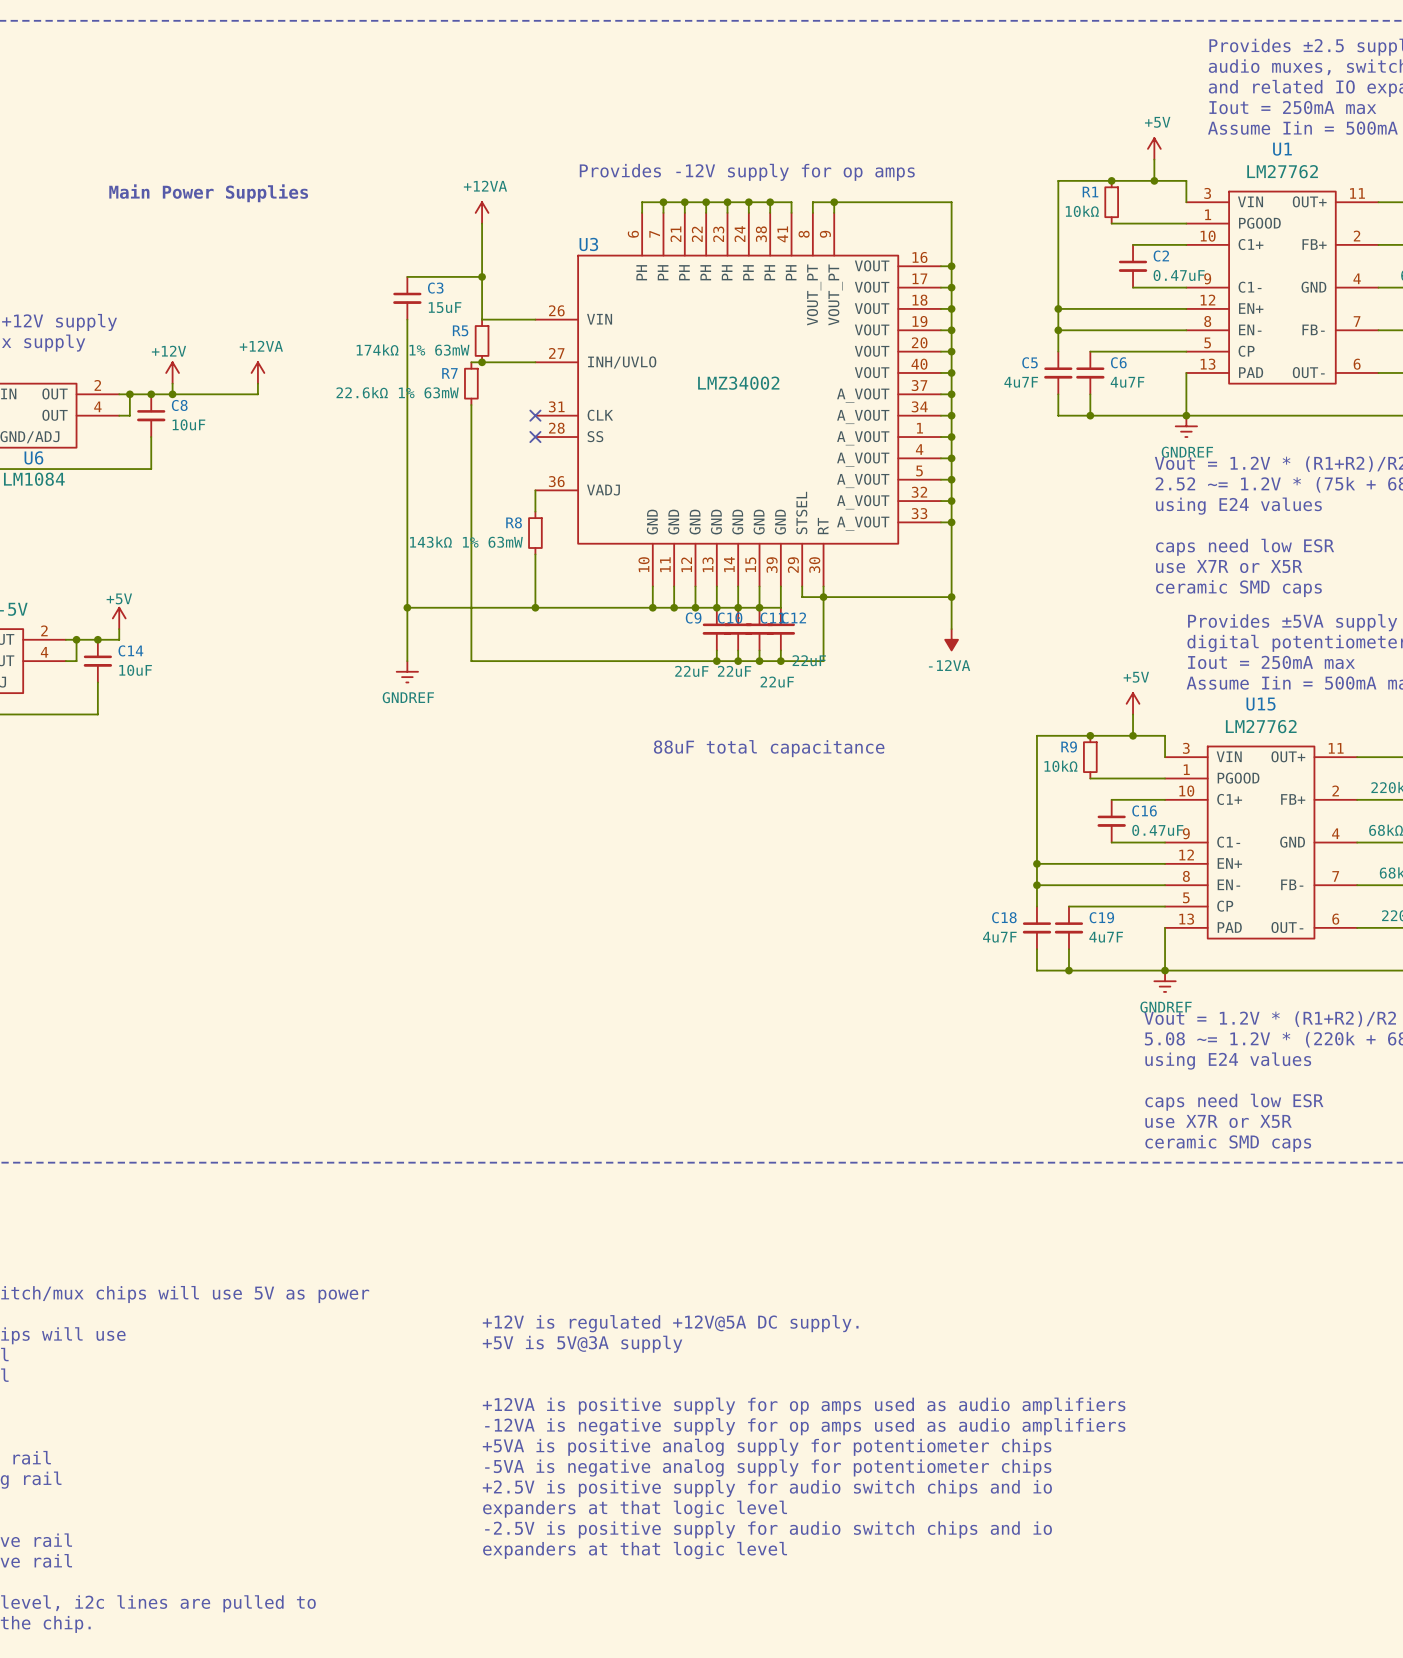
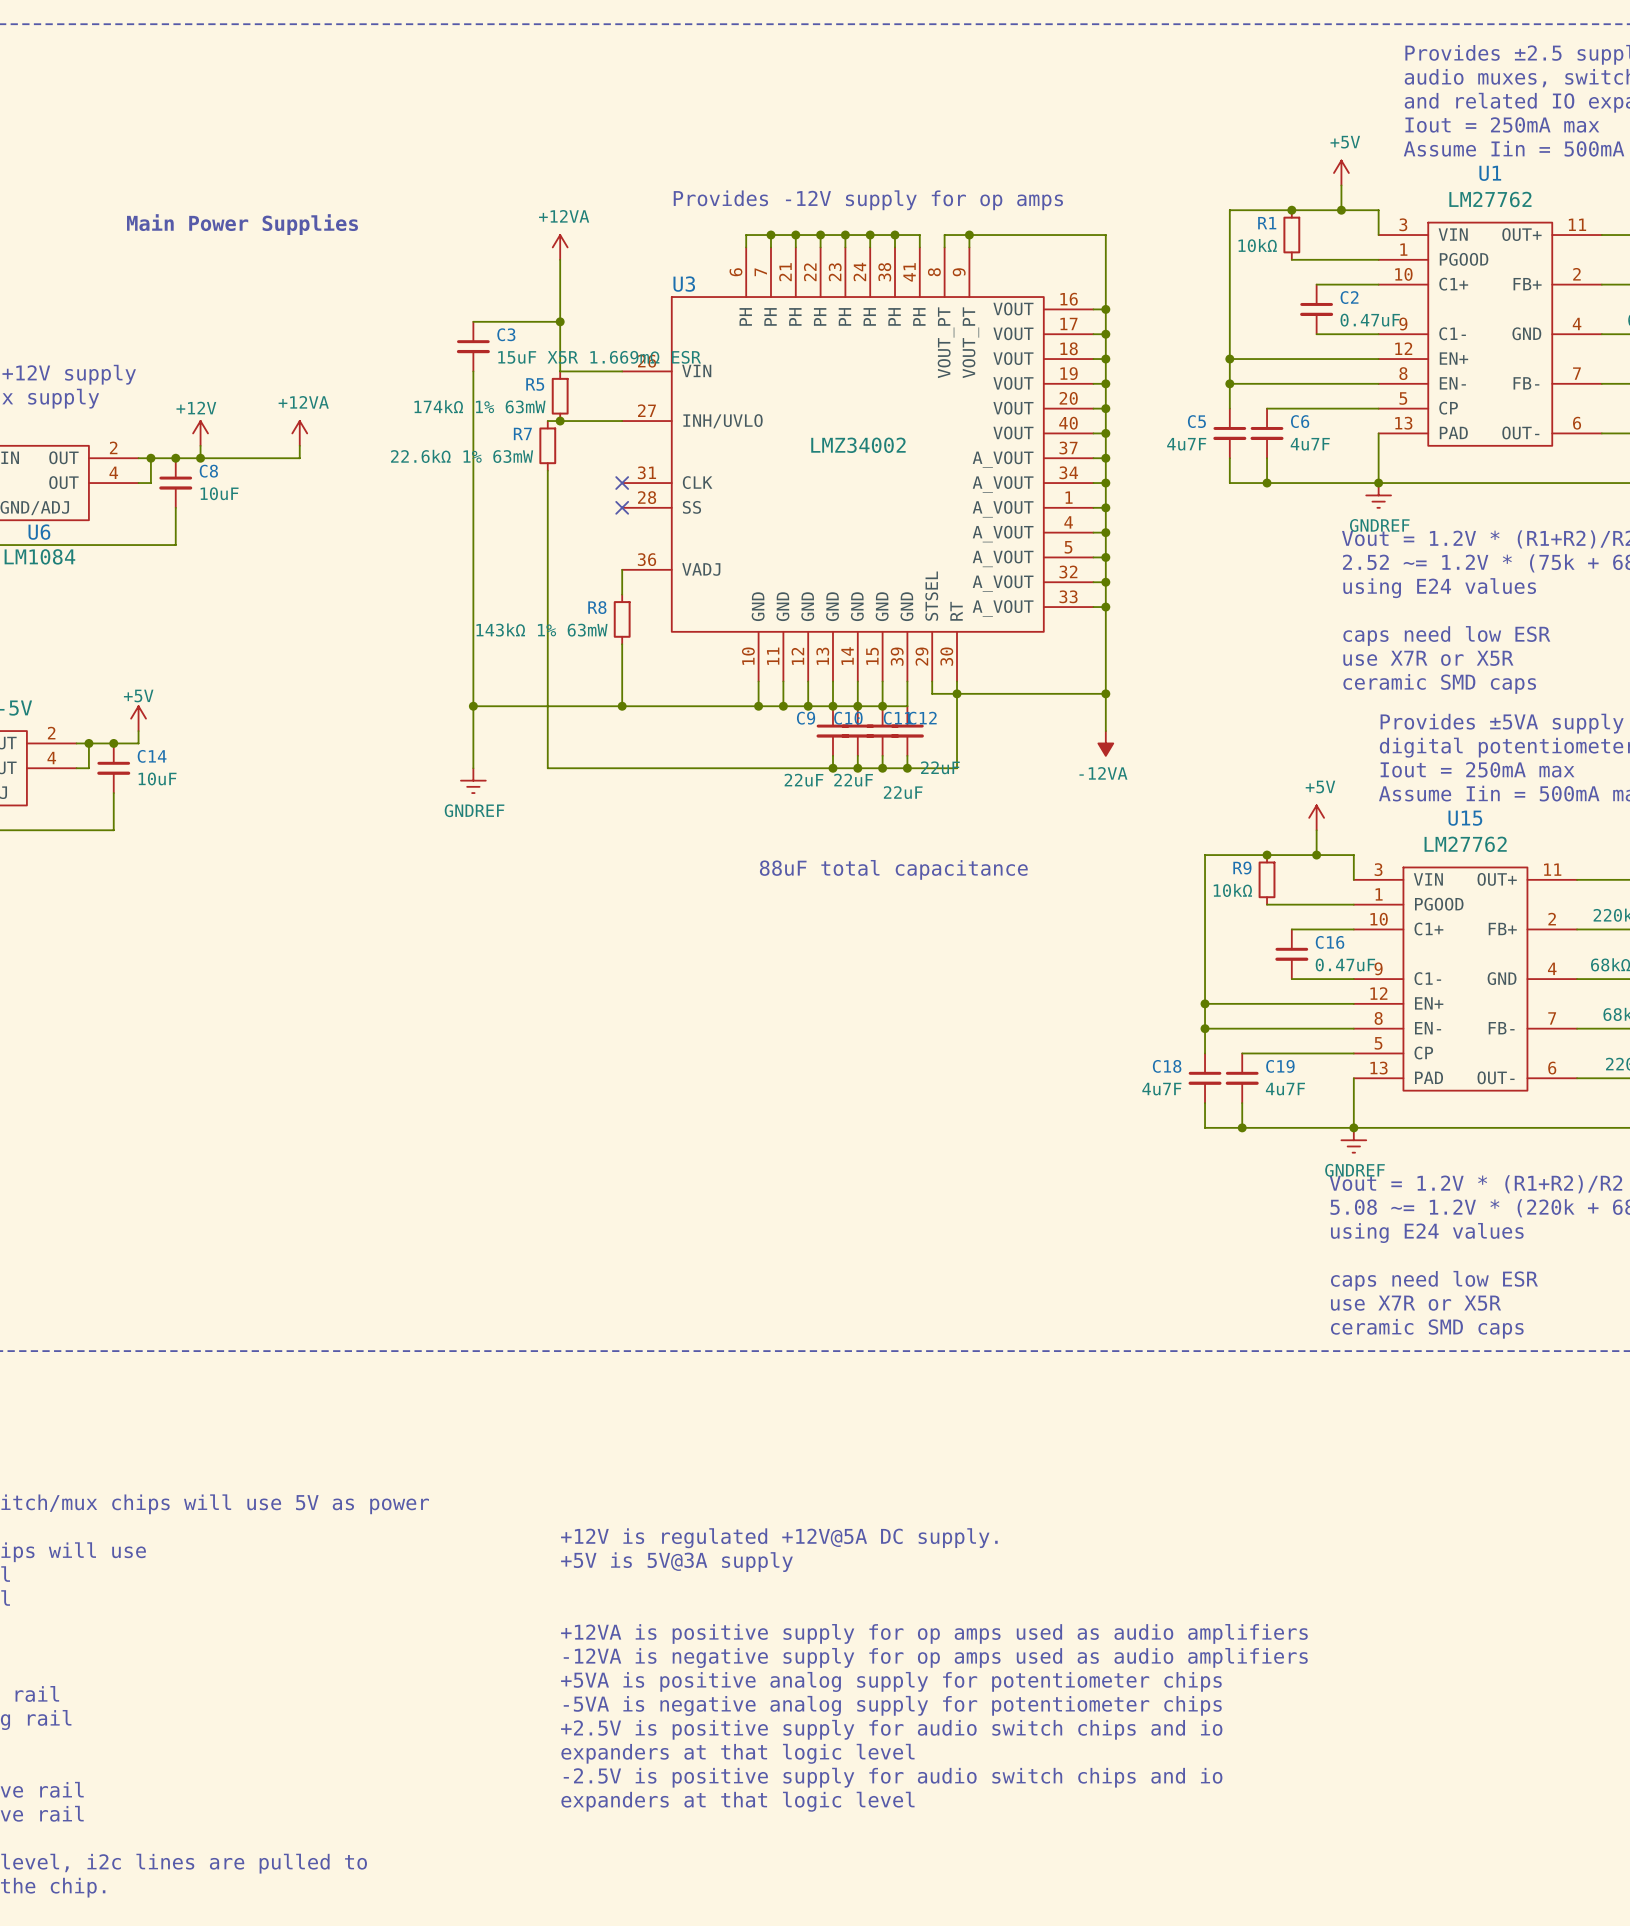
C3 value: 15uF (445, 307) -> 15uF X5R 1.669mΩ ESR (599, 357)

